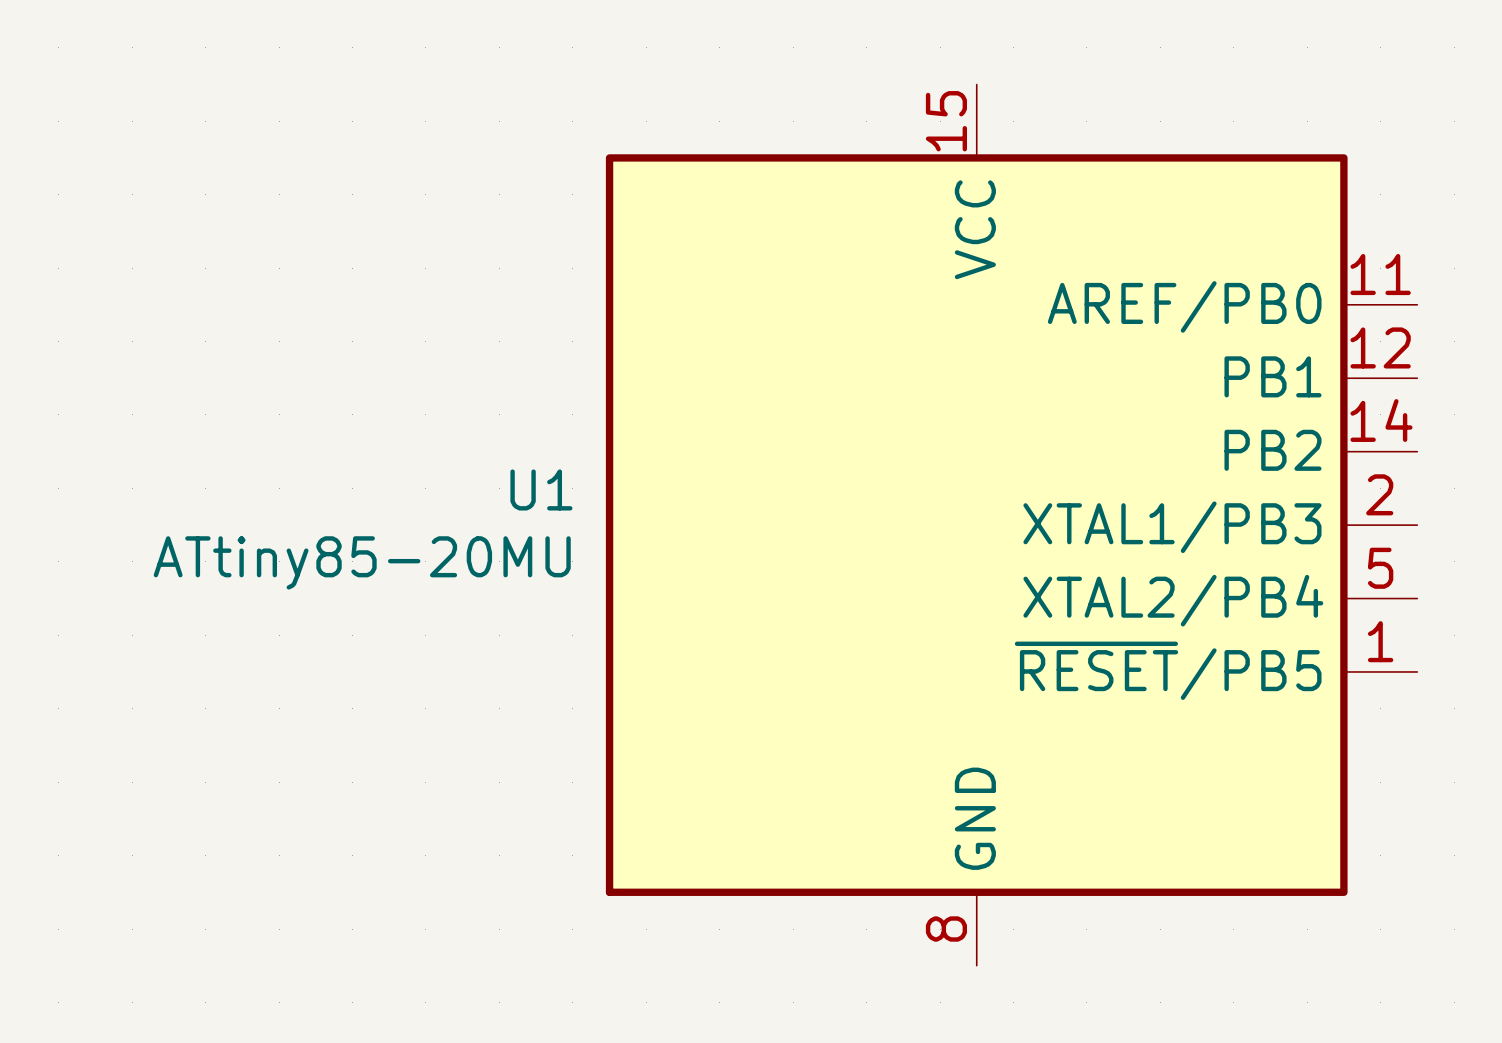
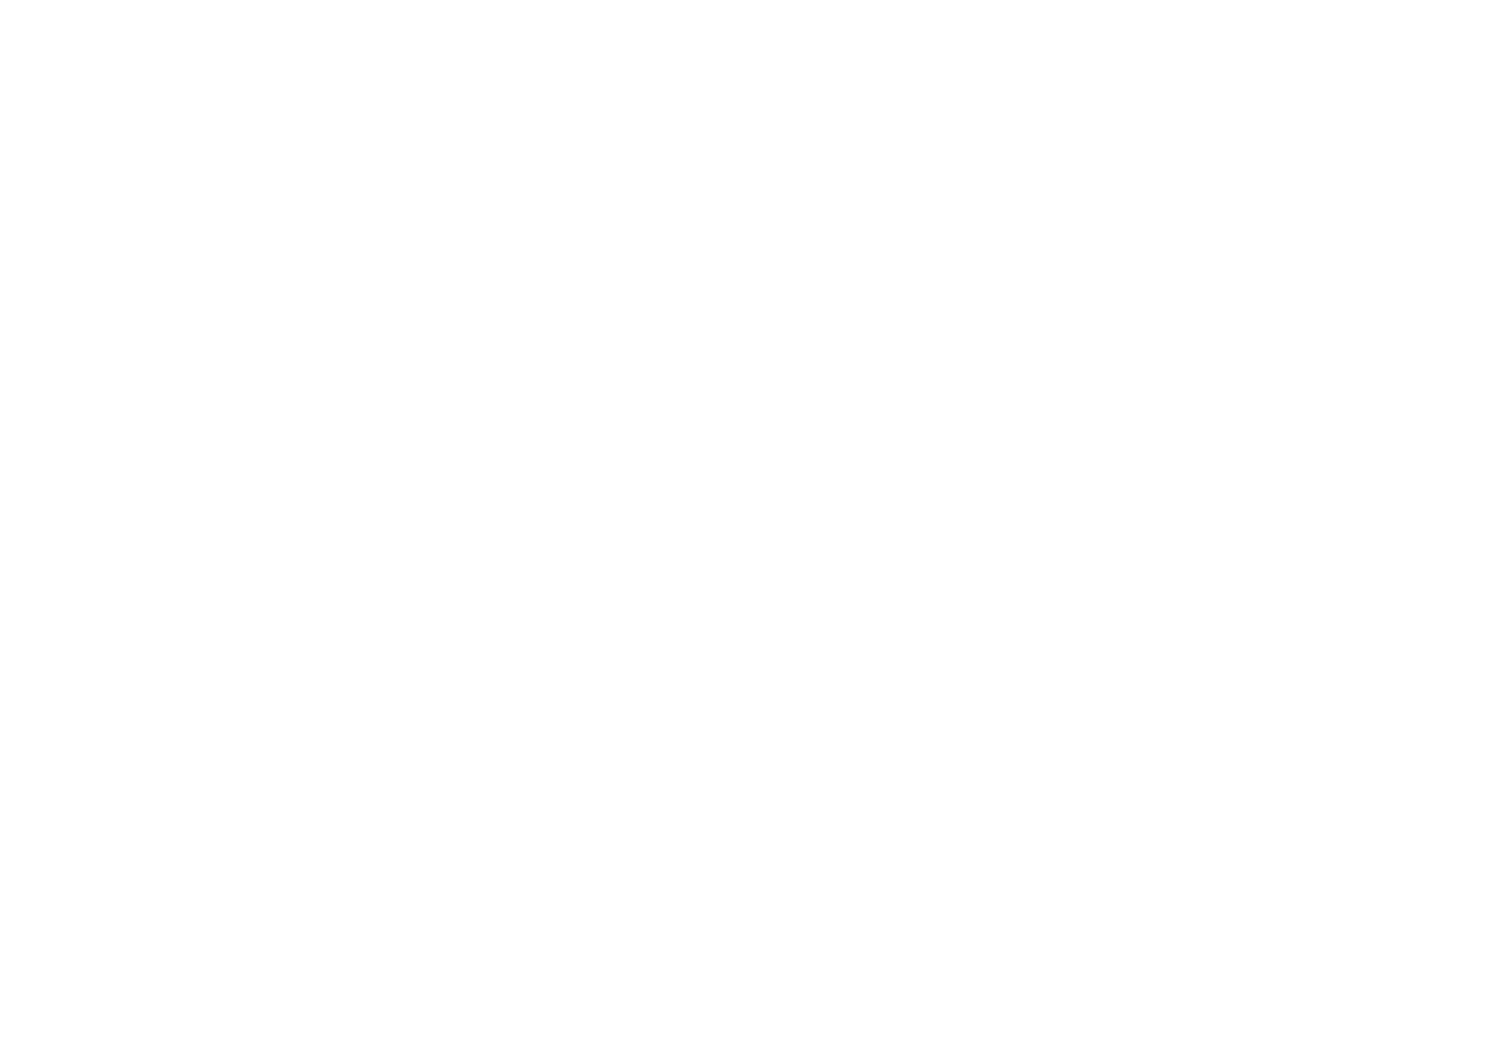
U1: ATtiny85-20MU (1011, 525) -> none

